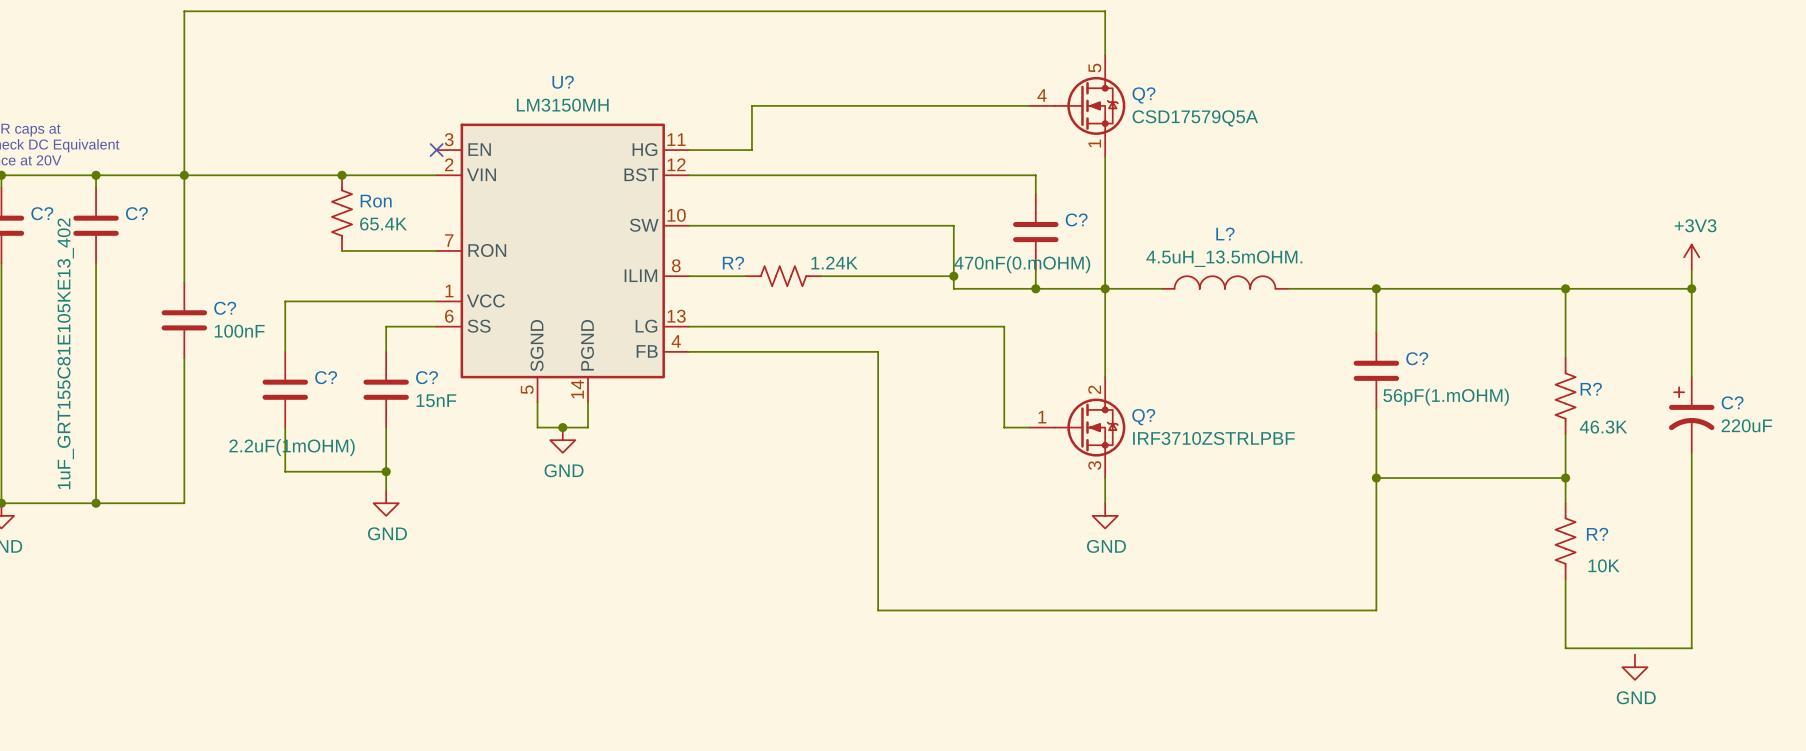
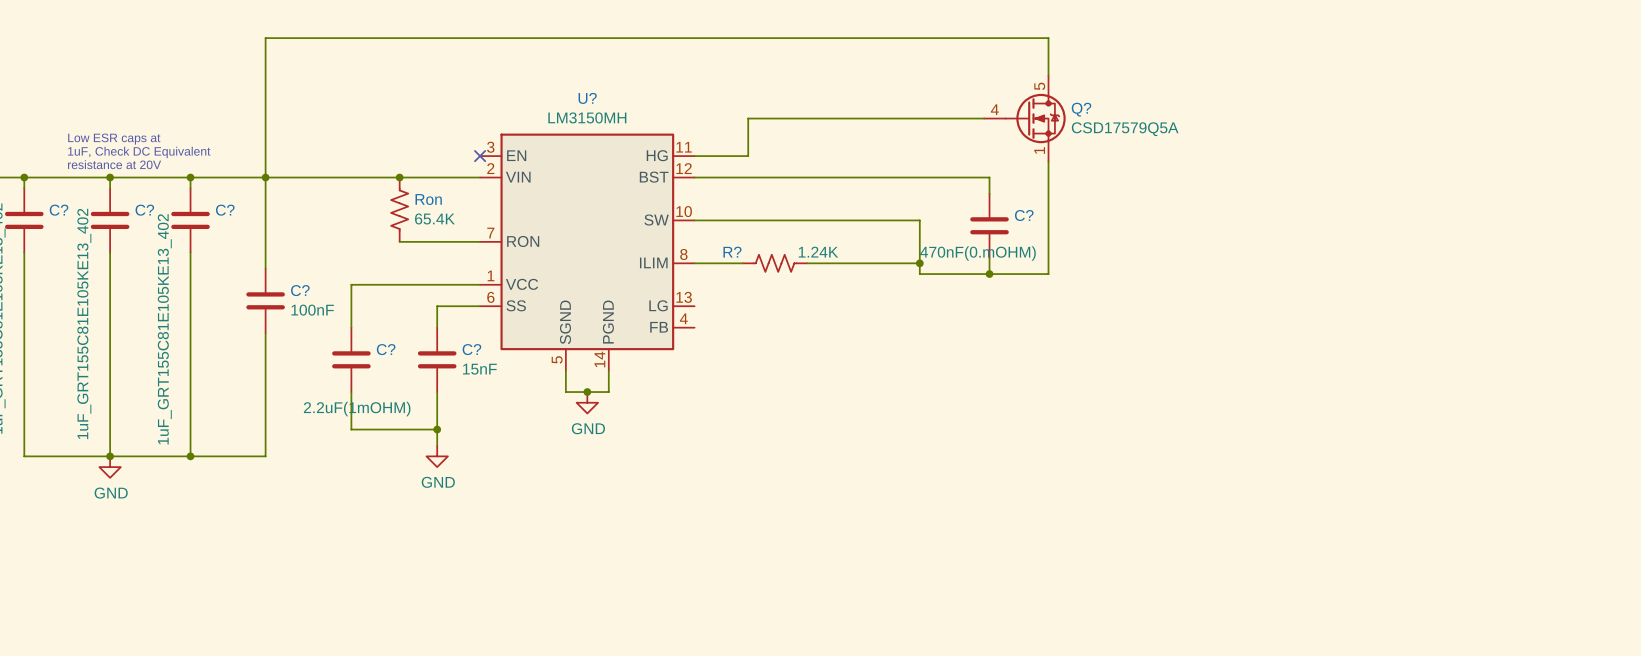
power symbol: +3V3 (1691, 257) -> none
wire: (1691, 269) (1691, 377) -> none
L?: 4.5uH_13.5mOHM. (1225, 282) -> none
junction: (1105, 288) -> none
wire: (1161, 288) (1105, 288) (1105, 377) -> none
wire: (1288, 288) (1691, 288) -> none
wire: (1376, 288) (1376, 332) -> none
junction: (1376, 288) -> none
wire: (1565, 288) (1565, 358) -> none
junction: (1565, 288) -> none
junction: (1691, 288) -> none
wire: (688, 326) (1004, 326) (1004, 427) (1029, 427) -> none
wire: (688, 351) (878, 351) (878, 610) (1376, 610) (1376, 408) -> none
C?: 56pF(1.mOHM) (1376, 370) -> none
R?: 46.3K (1565, 396) -> none
C?: 220uF (1691, 414) -> none
Q?: IRF3710ZSTRLPBF (1077, 427) -> none
wire: (1565, 433) (1565, 503) -> none
wire: (1691, 452) (1691, 648) (1565, 648) (1565, 578) -> none
wire: (1105, 478) (1105, 503) -> none
wire: (1376, 478) (1565, 478) -> none
junction: (1376, 478) -> none
junction: (1565, 478) -> none
power symbol: GND (1105, 515) -> none
R?: 10K (1565, 541) -> none
power symbol: GND (1634, 667) -> none

